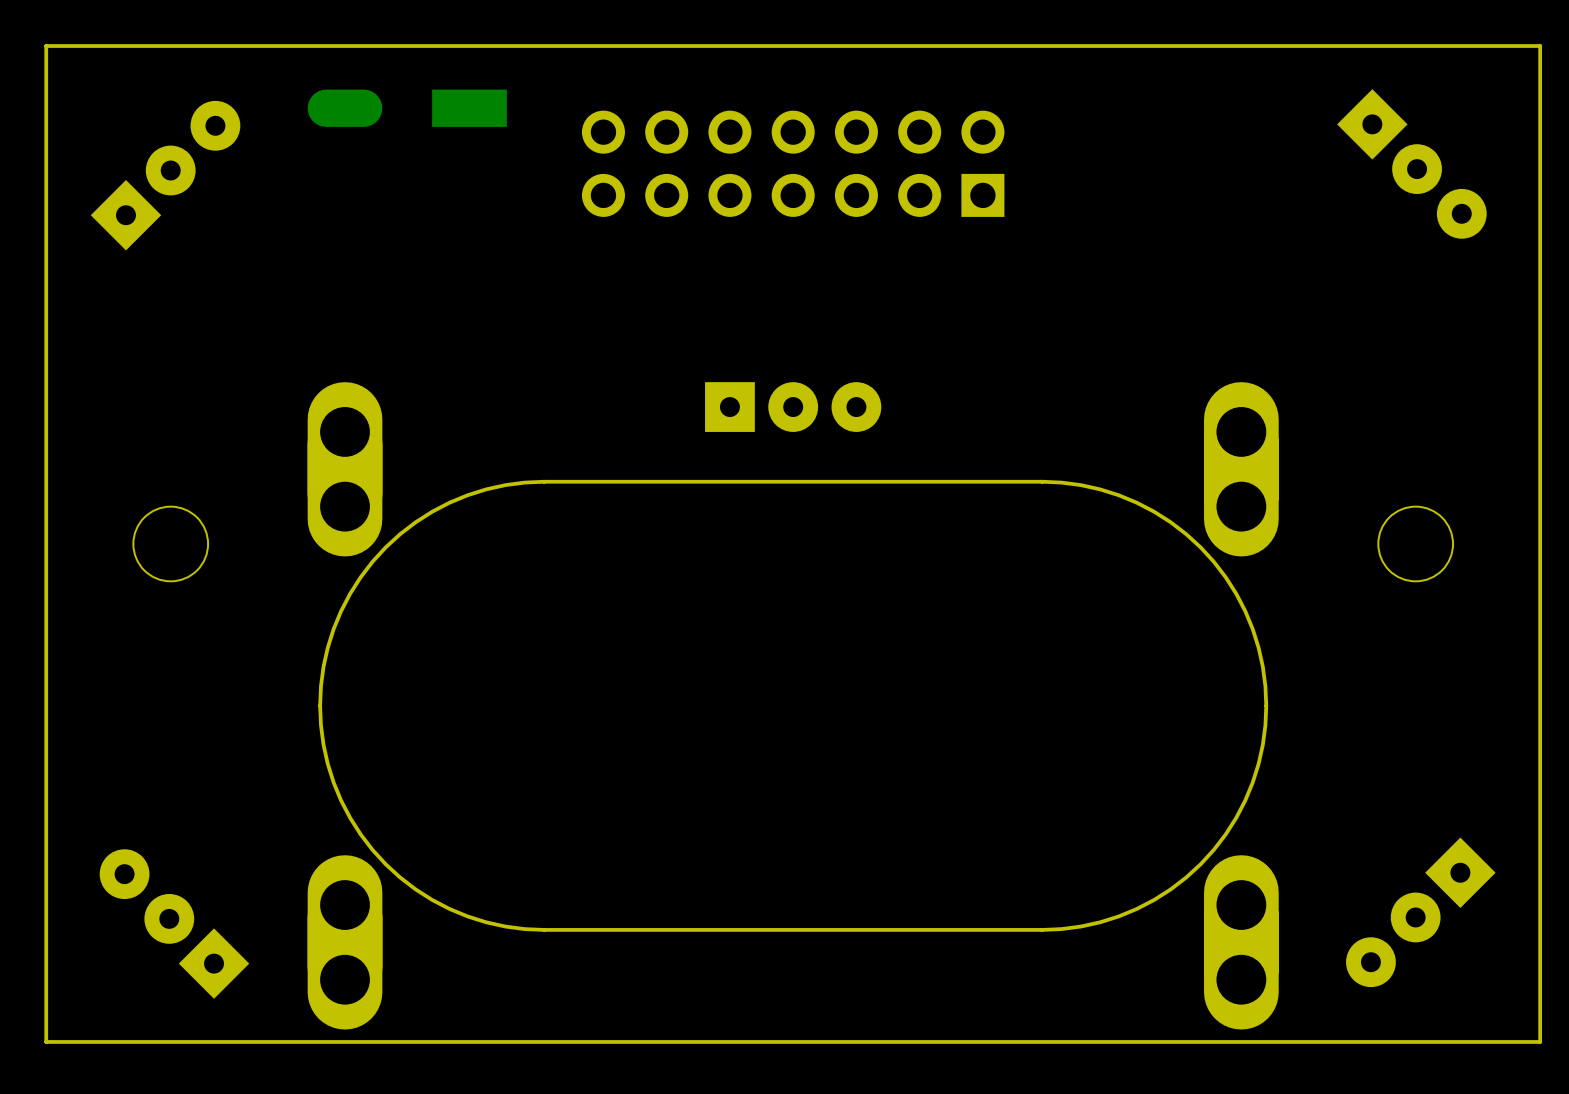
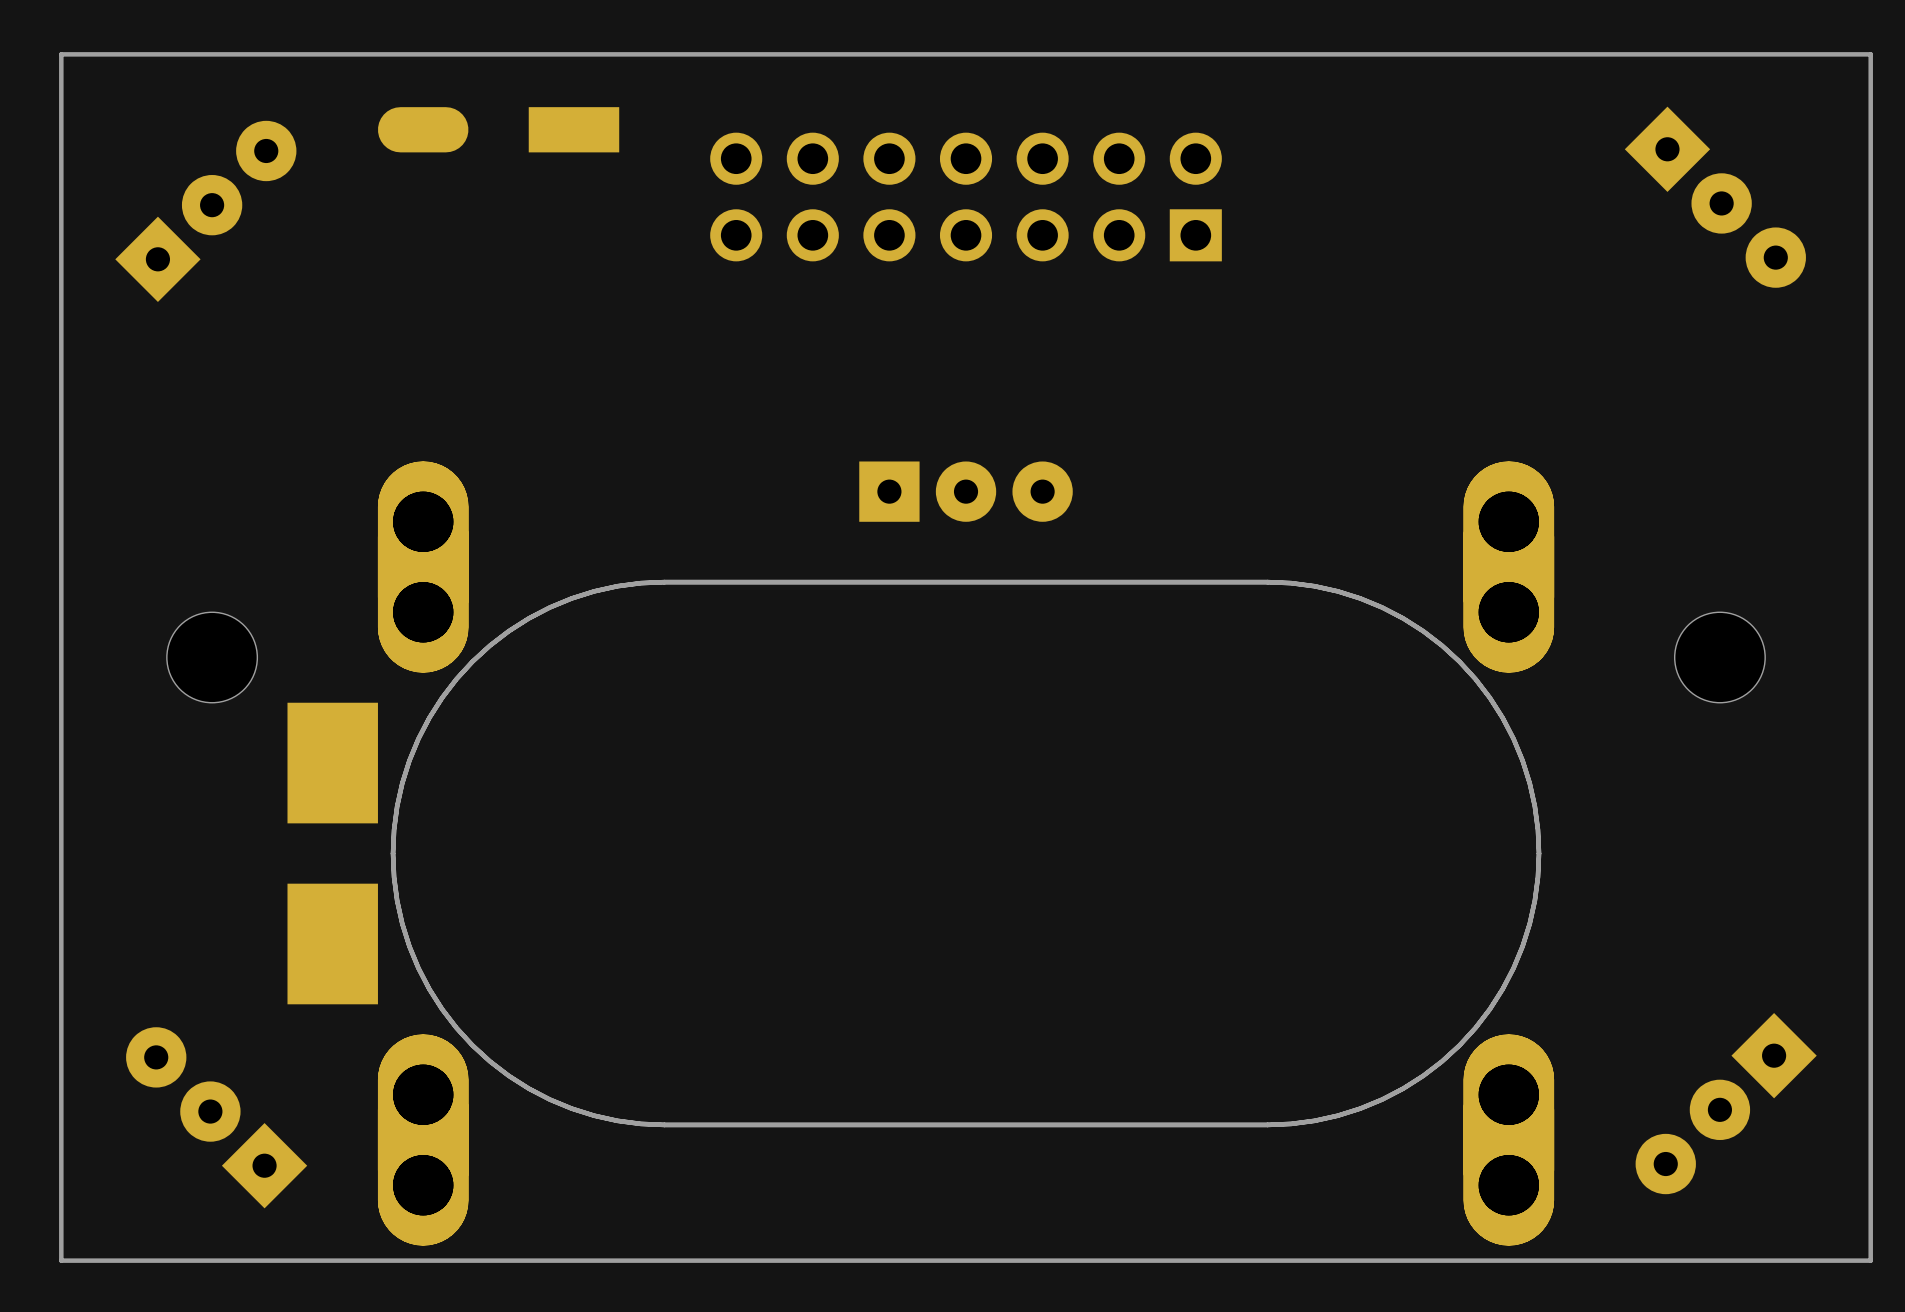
part: none -> (920, 853)

